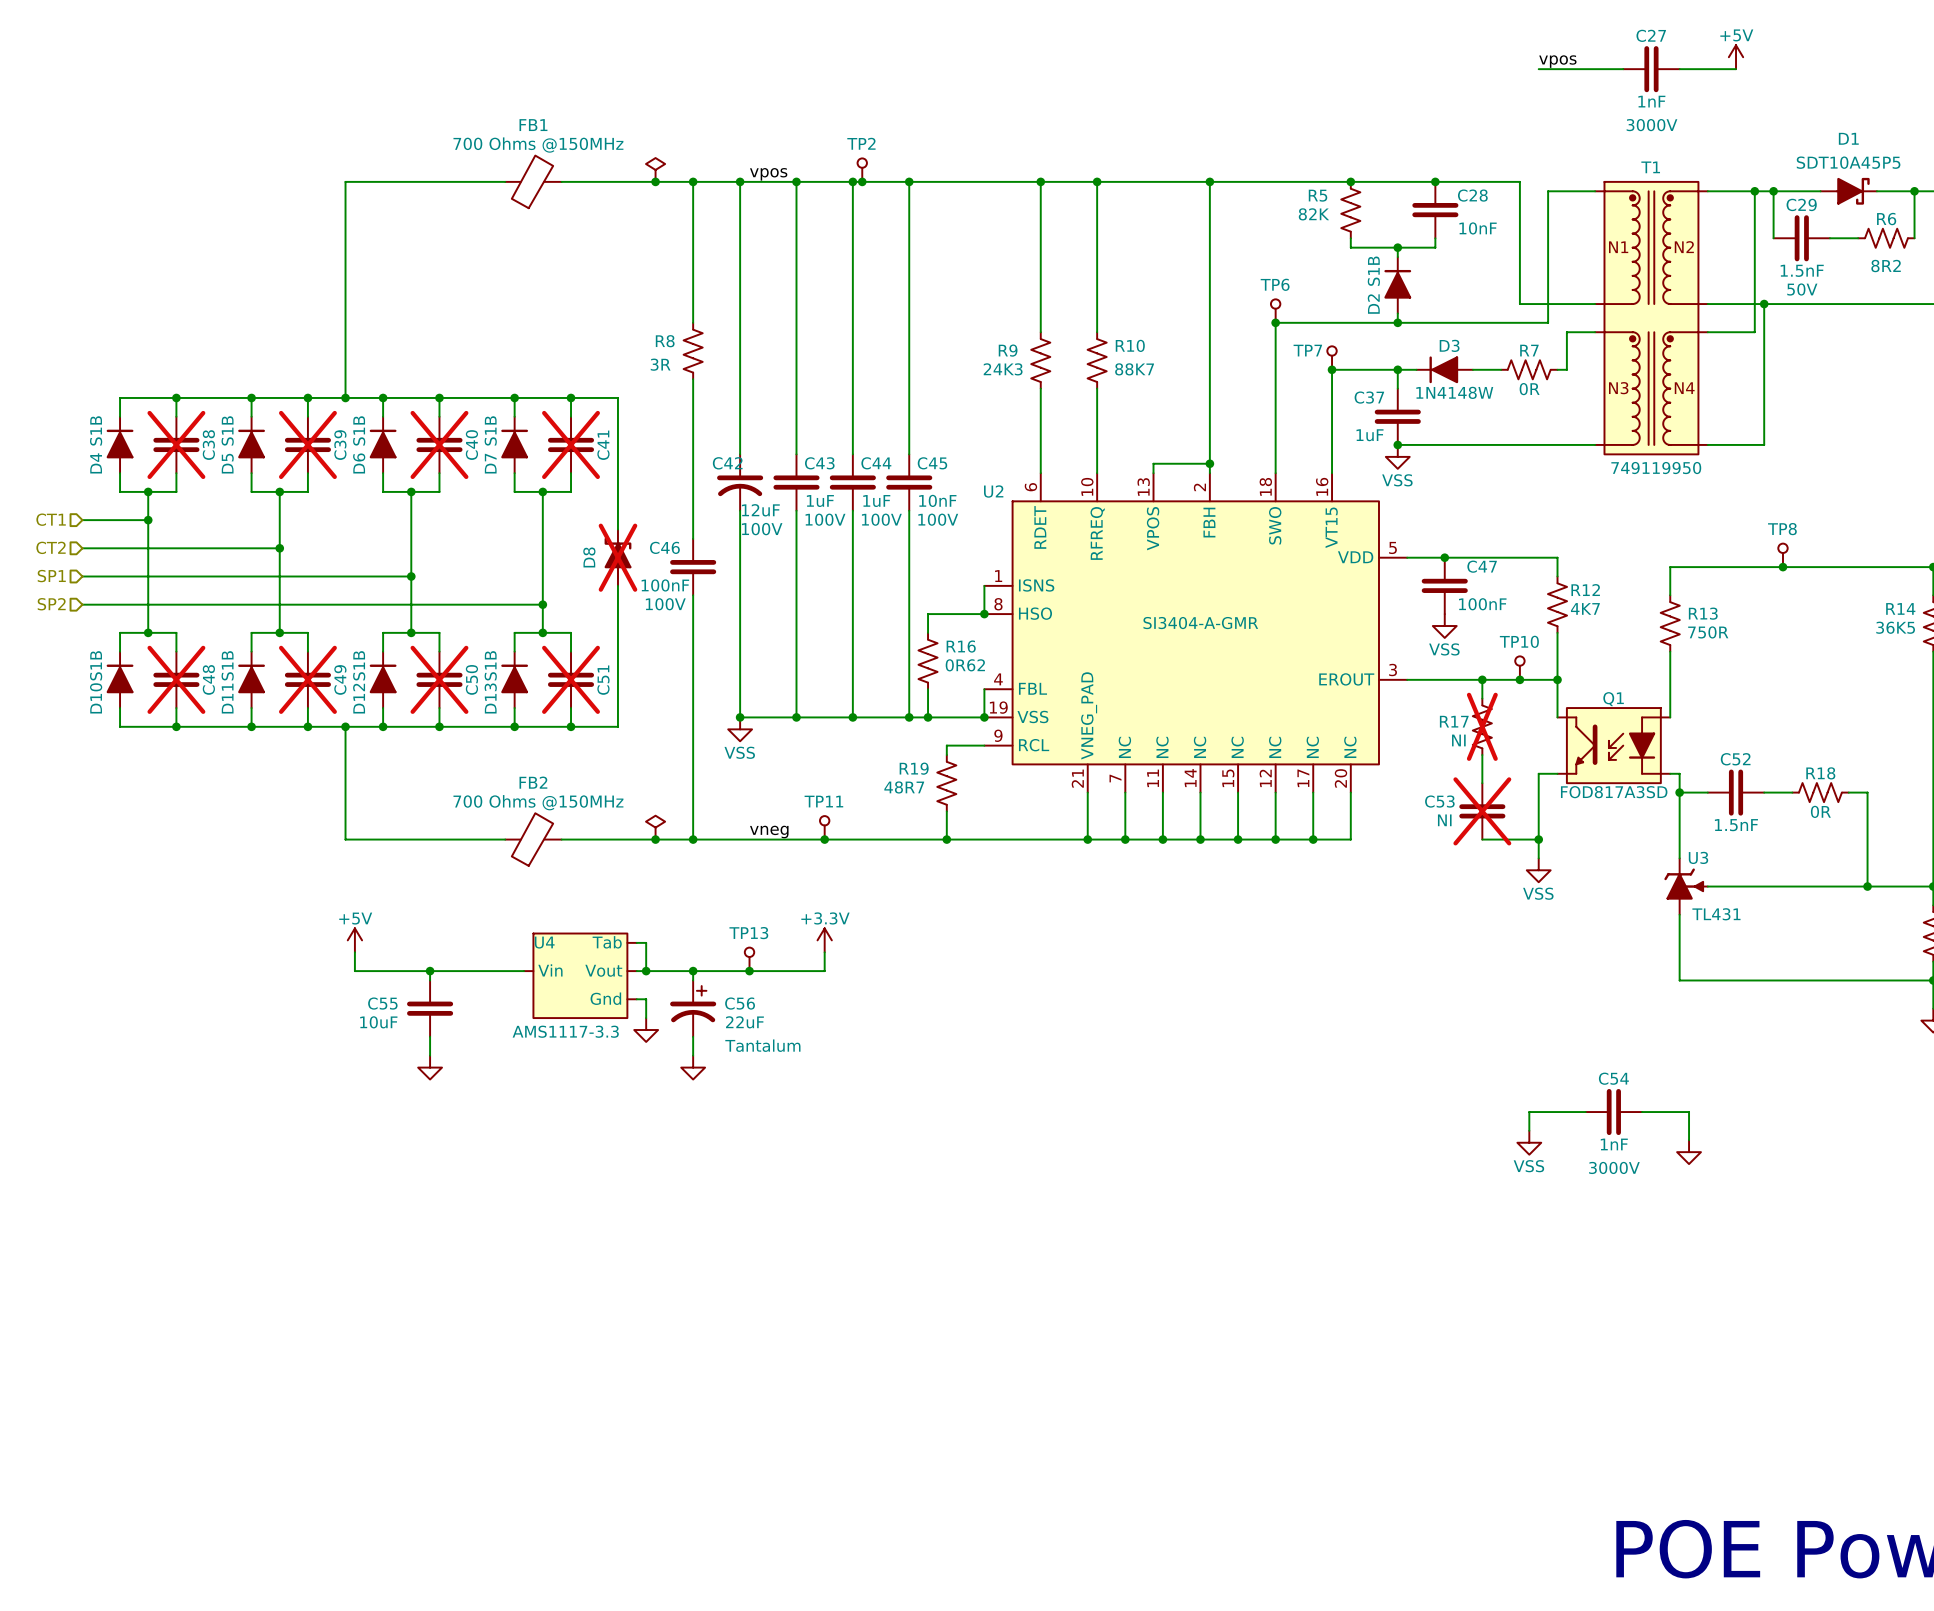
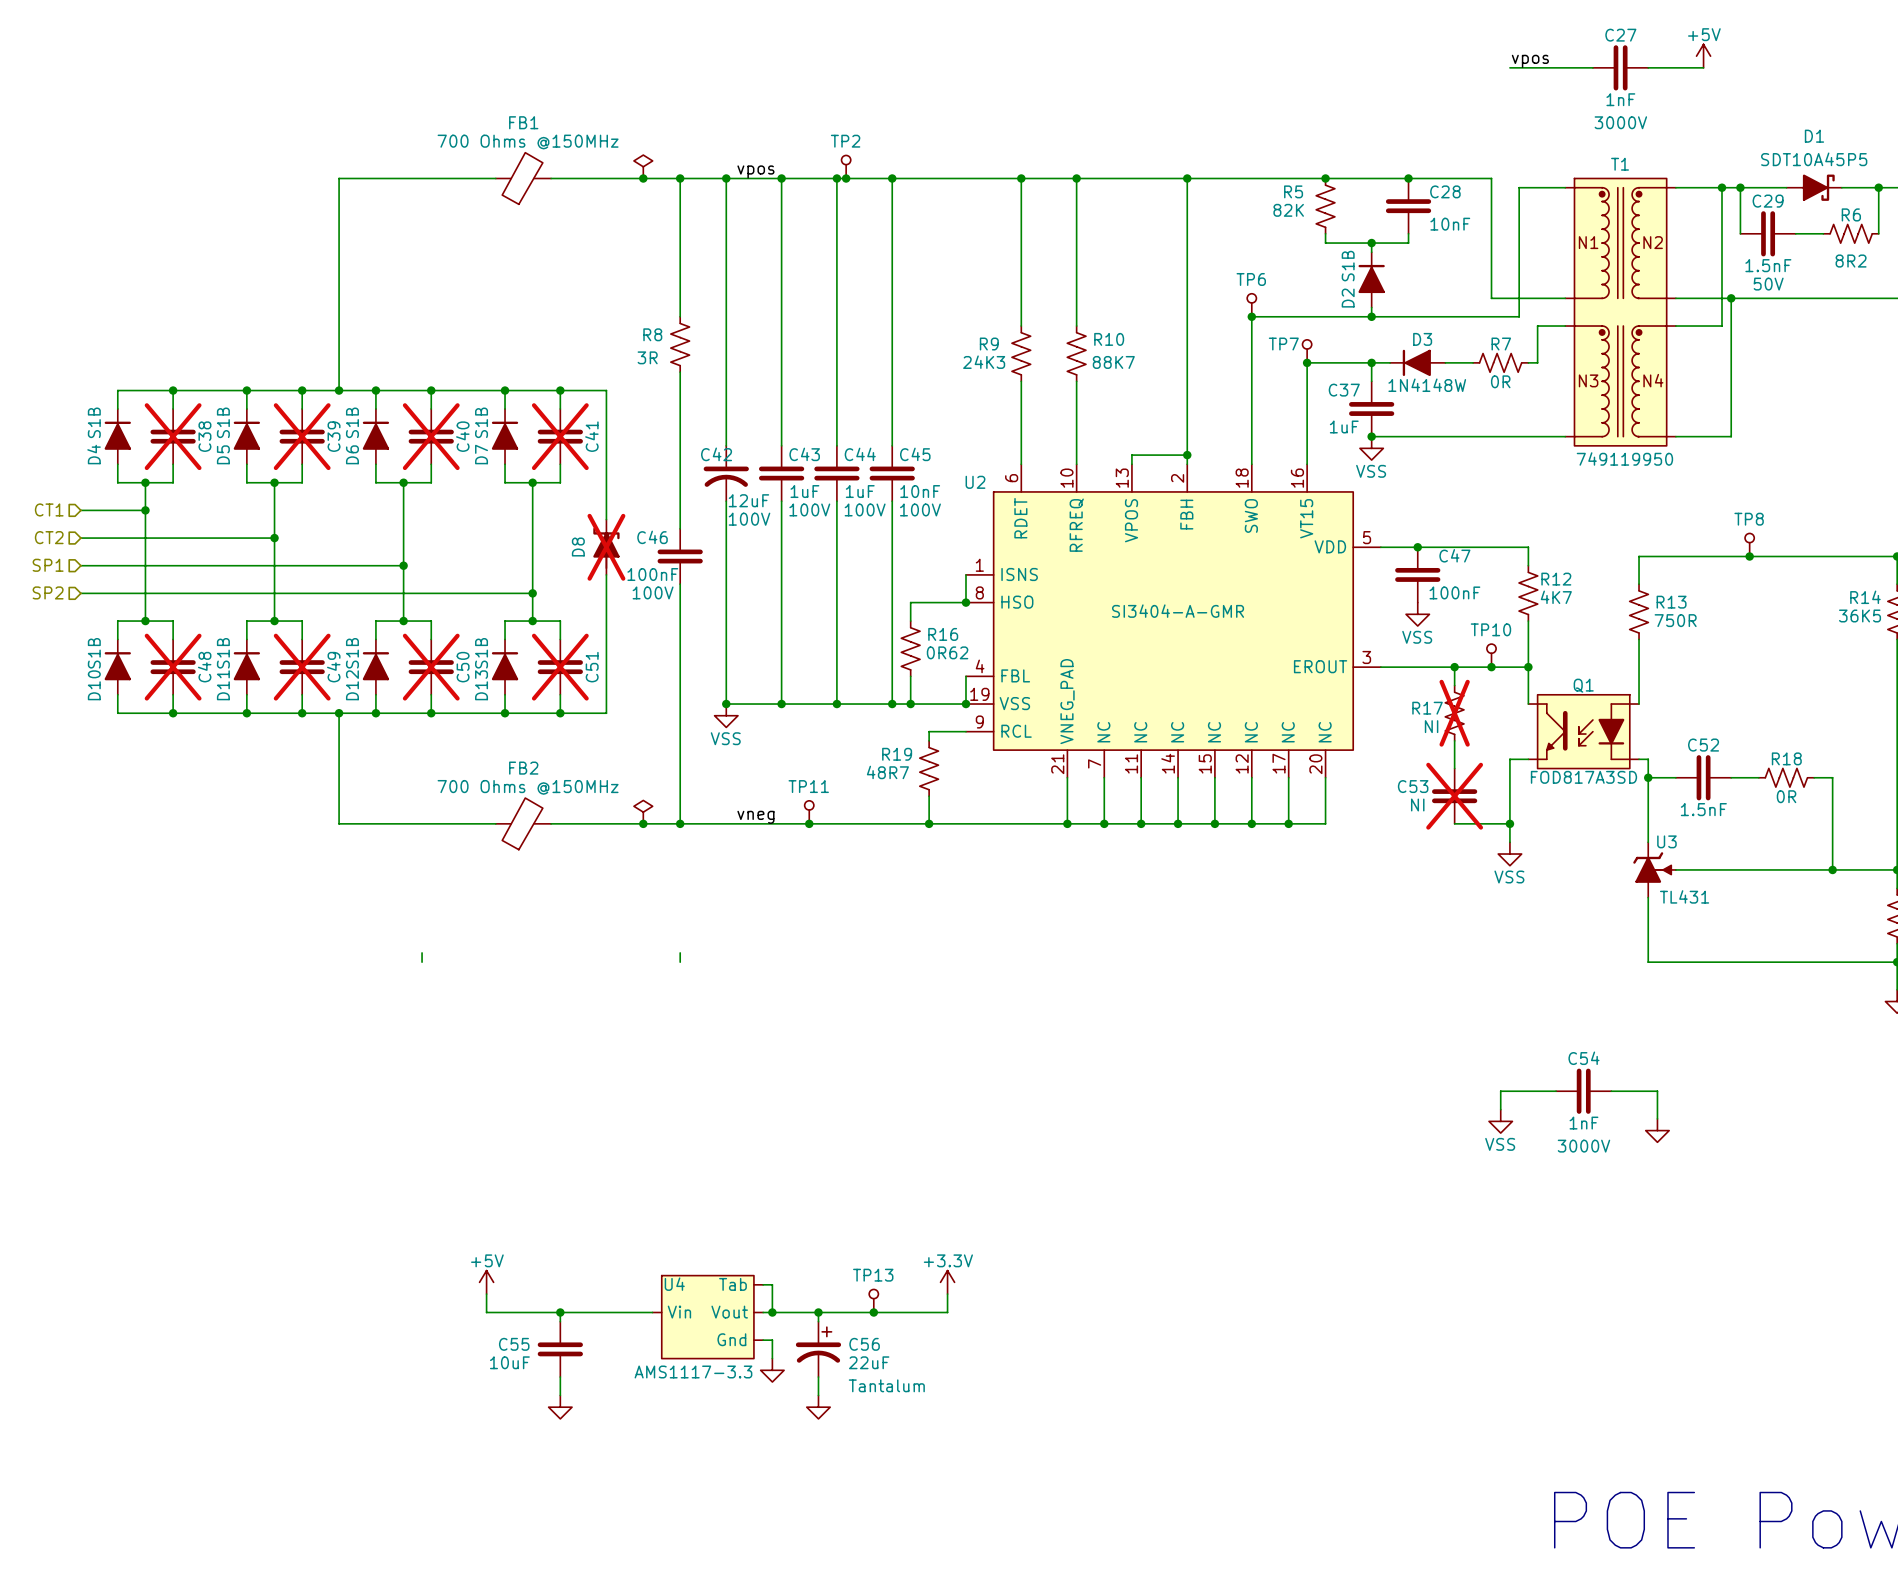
power symbol: +5V (354, 940) -> none
power symbol: +3.3V (824, 940) -> none
wire: (636, 942) (646, 942) (646, 971) -> none
wire: (354, 952) (354, 971) (524, 971) -> none
wire: (824, 952) (824, 971) (636, 971) -> none
TP13 position: (749, 959) -> (873, 1300)
junction: (430, 971) -> none
junction: (646, 971) -> none
junction: (693, 971) -> none
junction: (749, 971) -> none
U4 position: (580, 975) -> (707, 1317)
wire: (636, 999) (646, 999) (646, 1018) -> none
C55 position: (430, 1008) -> (560, 1349)
C56 position: (693, 1008) -> (818, 1349)
power symbol: (646, 1030) -> none
wire: (430, 1036) (430, 1055) -> none
wire: (693, 1036) (693, 1055) -> none
power symbol: (430, 1067) -> none
power symbol: (693, 1067) -> none
power symbol: none -> +5V (486, 1282)
power symbol: none -> +3.3V (947, 1282)
wire: none -> (763, 1284) (772, 1284) (772, 1312)
wire: none -> (486, 1294) (486, 1312) (652, 1312)
wire: none -> (947, 1294) (947, 1312) (763, 1312)
wire: none -> (560, 1312) (560, 1321)
junction: none -> (560, 1312)
junction: none -> (772, 1312)
wire: none -> (818, 1312) (818, 1321)
junction: none -> (818, 1312)
junction: none -> (873, 1312)
wire: none -> (763, 1340) (772, 1340) (772, 1358)
power symbol: none -> (772, 1370)
wire: none -> (560, 1377) (560, 1395)
wire: none -> (818, 1377) (818, 1395)
power symbol: none -> (560, 1407)
power symbol: none -> (818, 1407)

